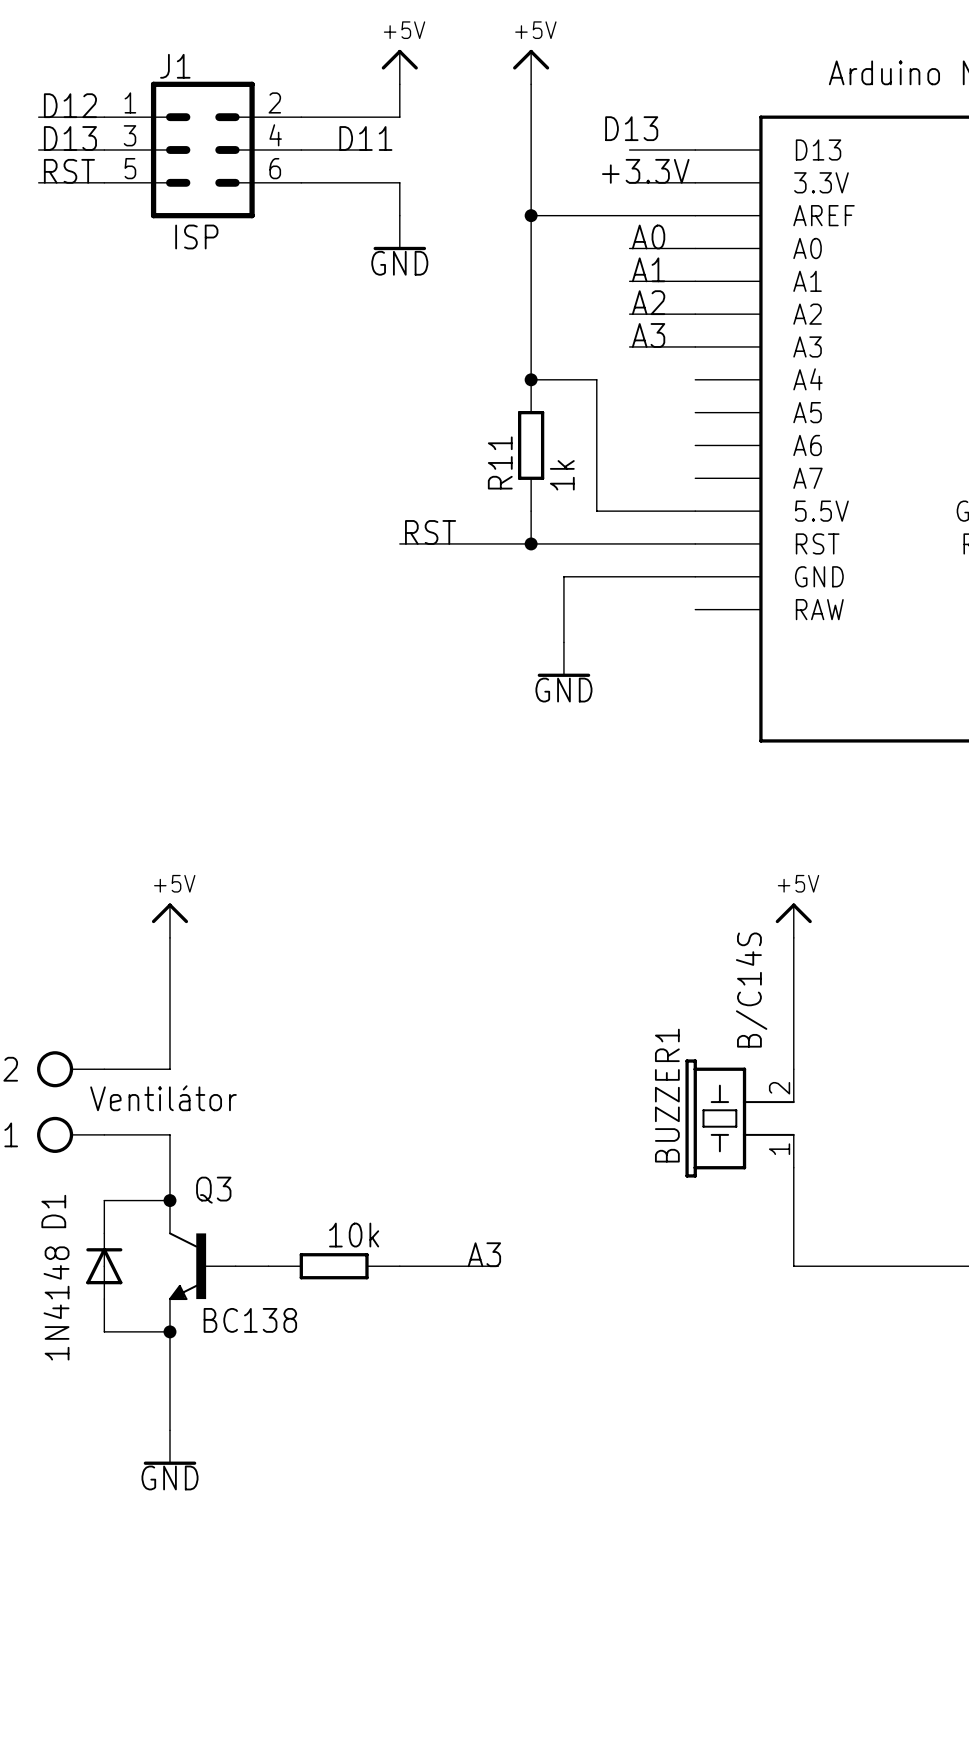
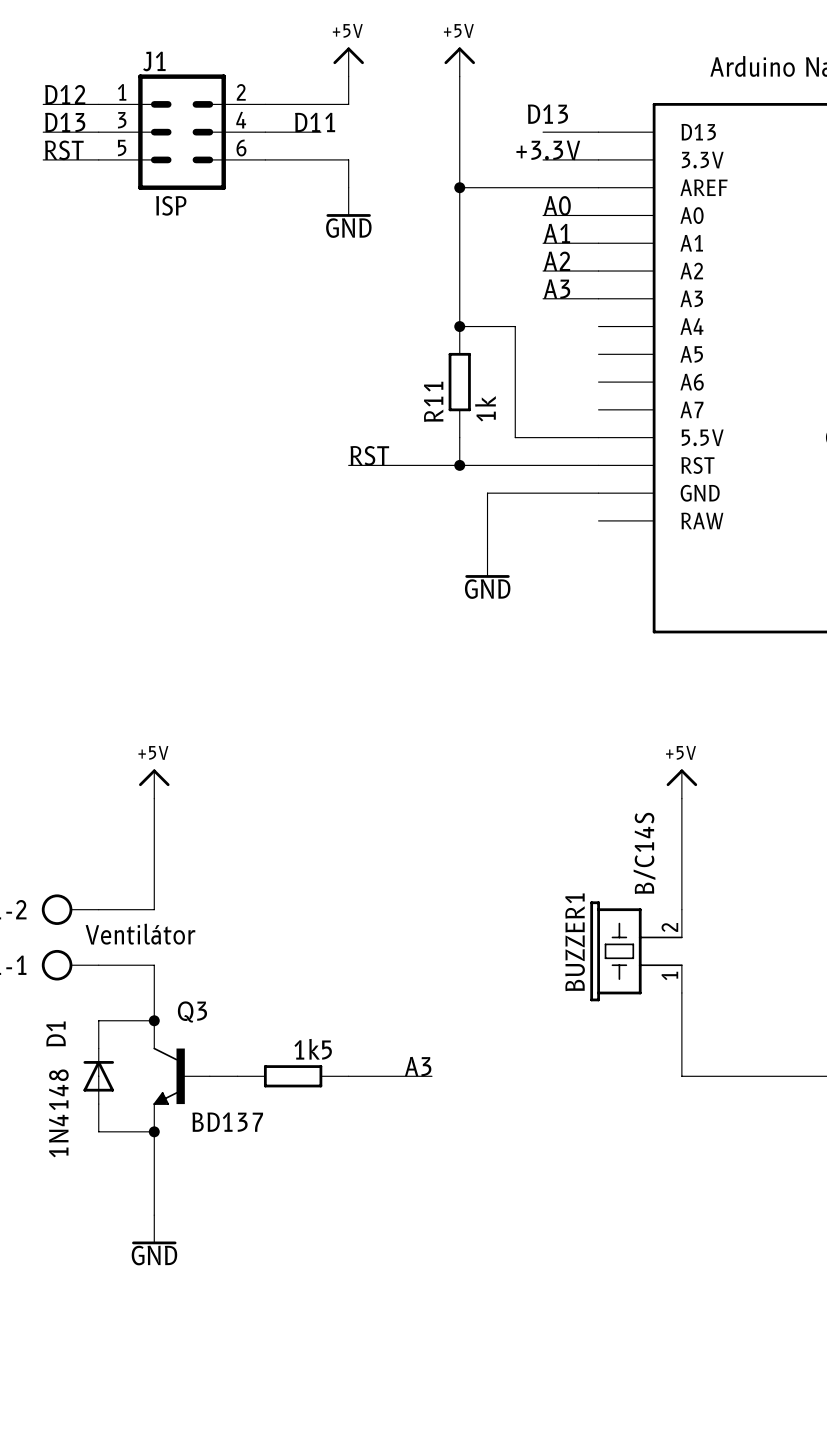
part value: 10k (354, 1235) -> 1k5 (313, 1049)
Q3 value: BC138 (250, 1320) -> BD137 (227, 1122)

